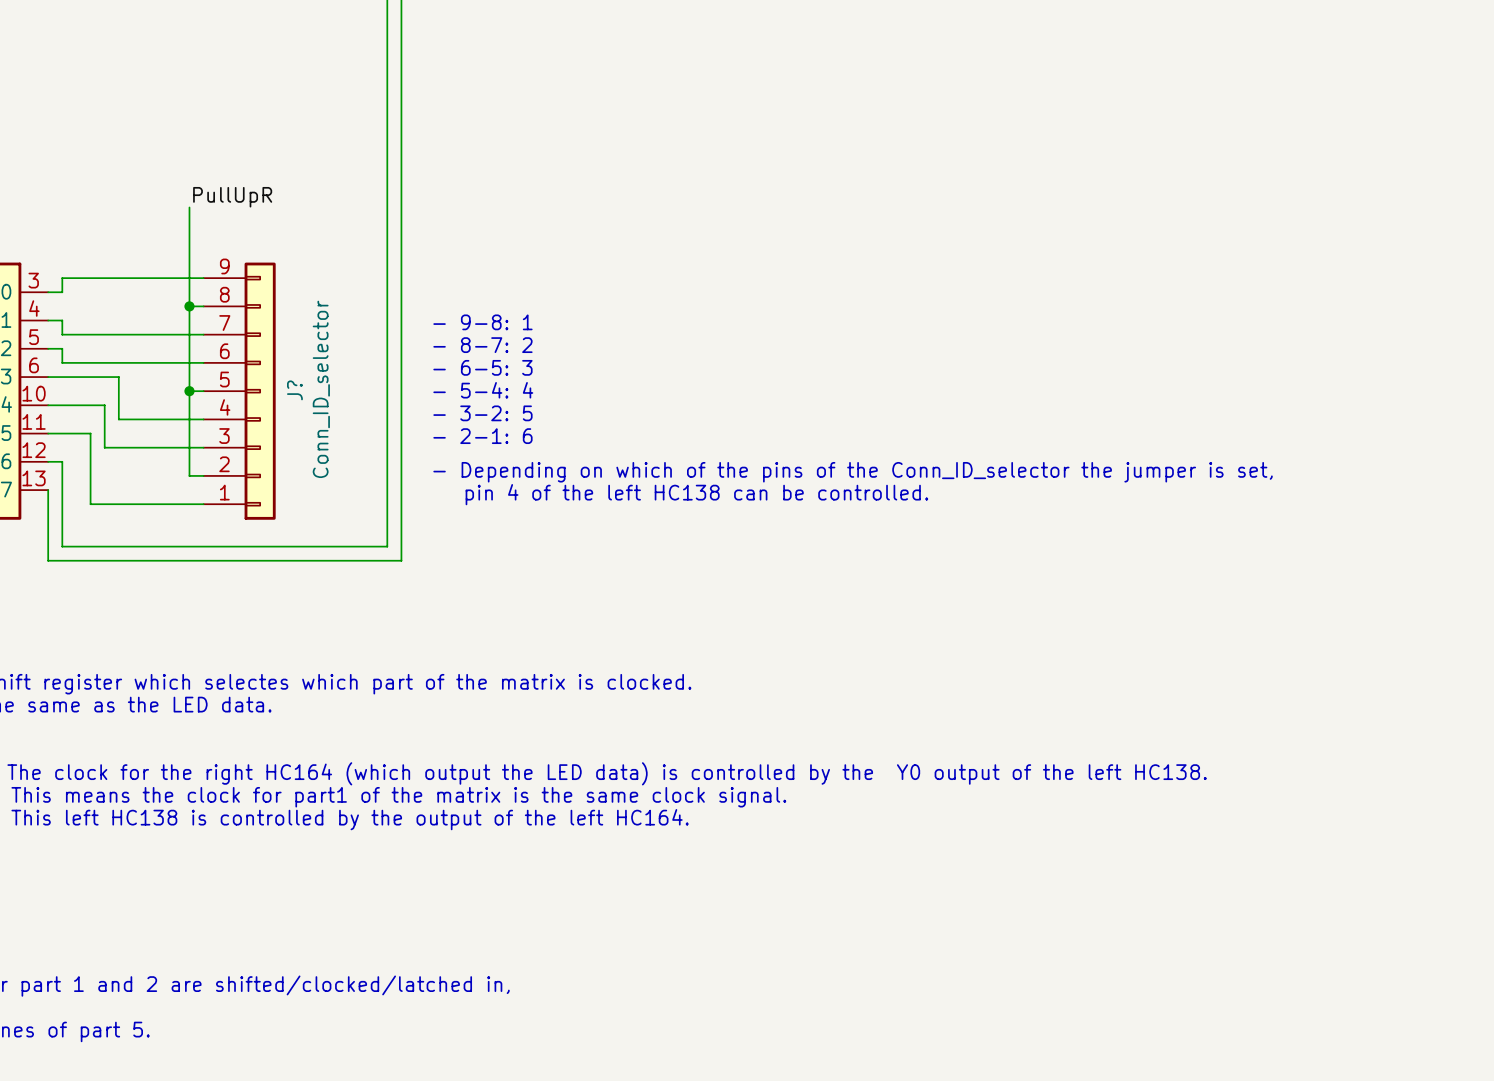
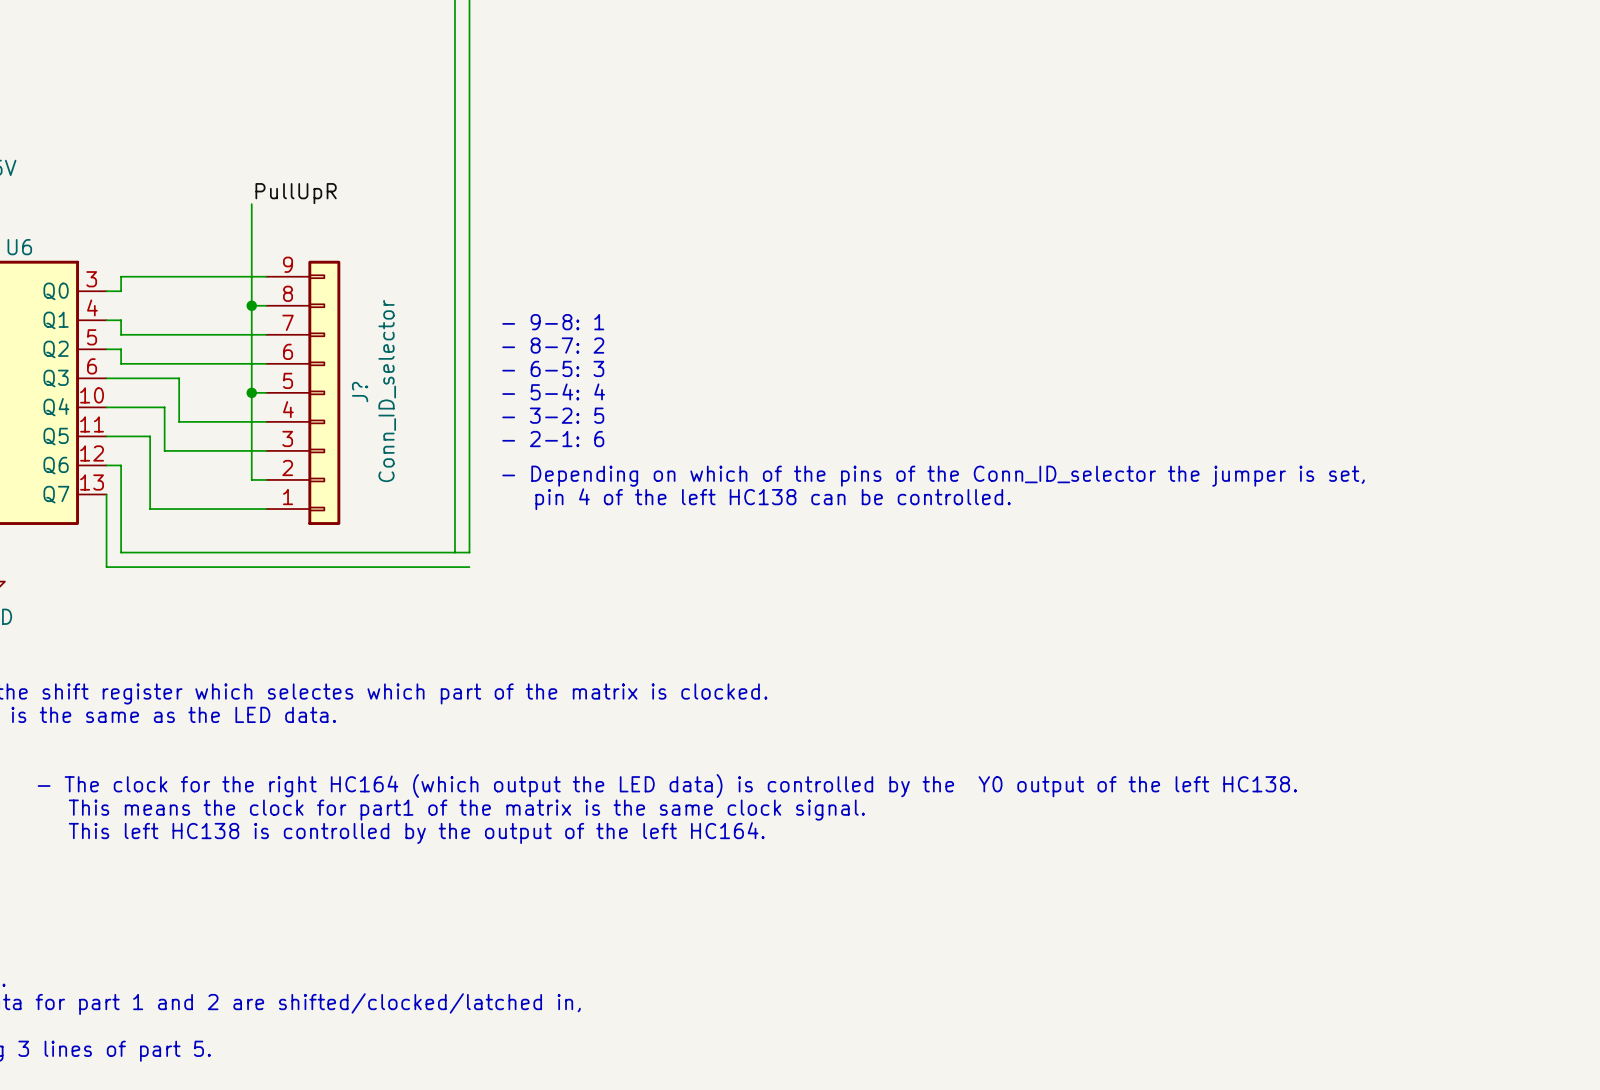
wire: (401, 546) (401, 560) -> (469, 552) (454, 552)

